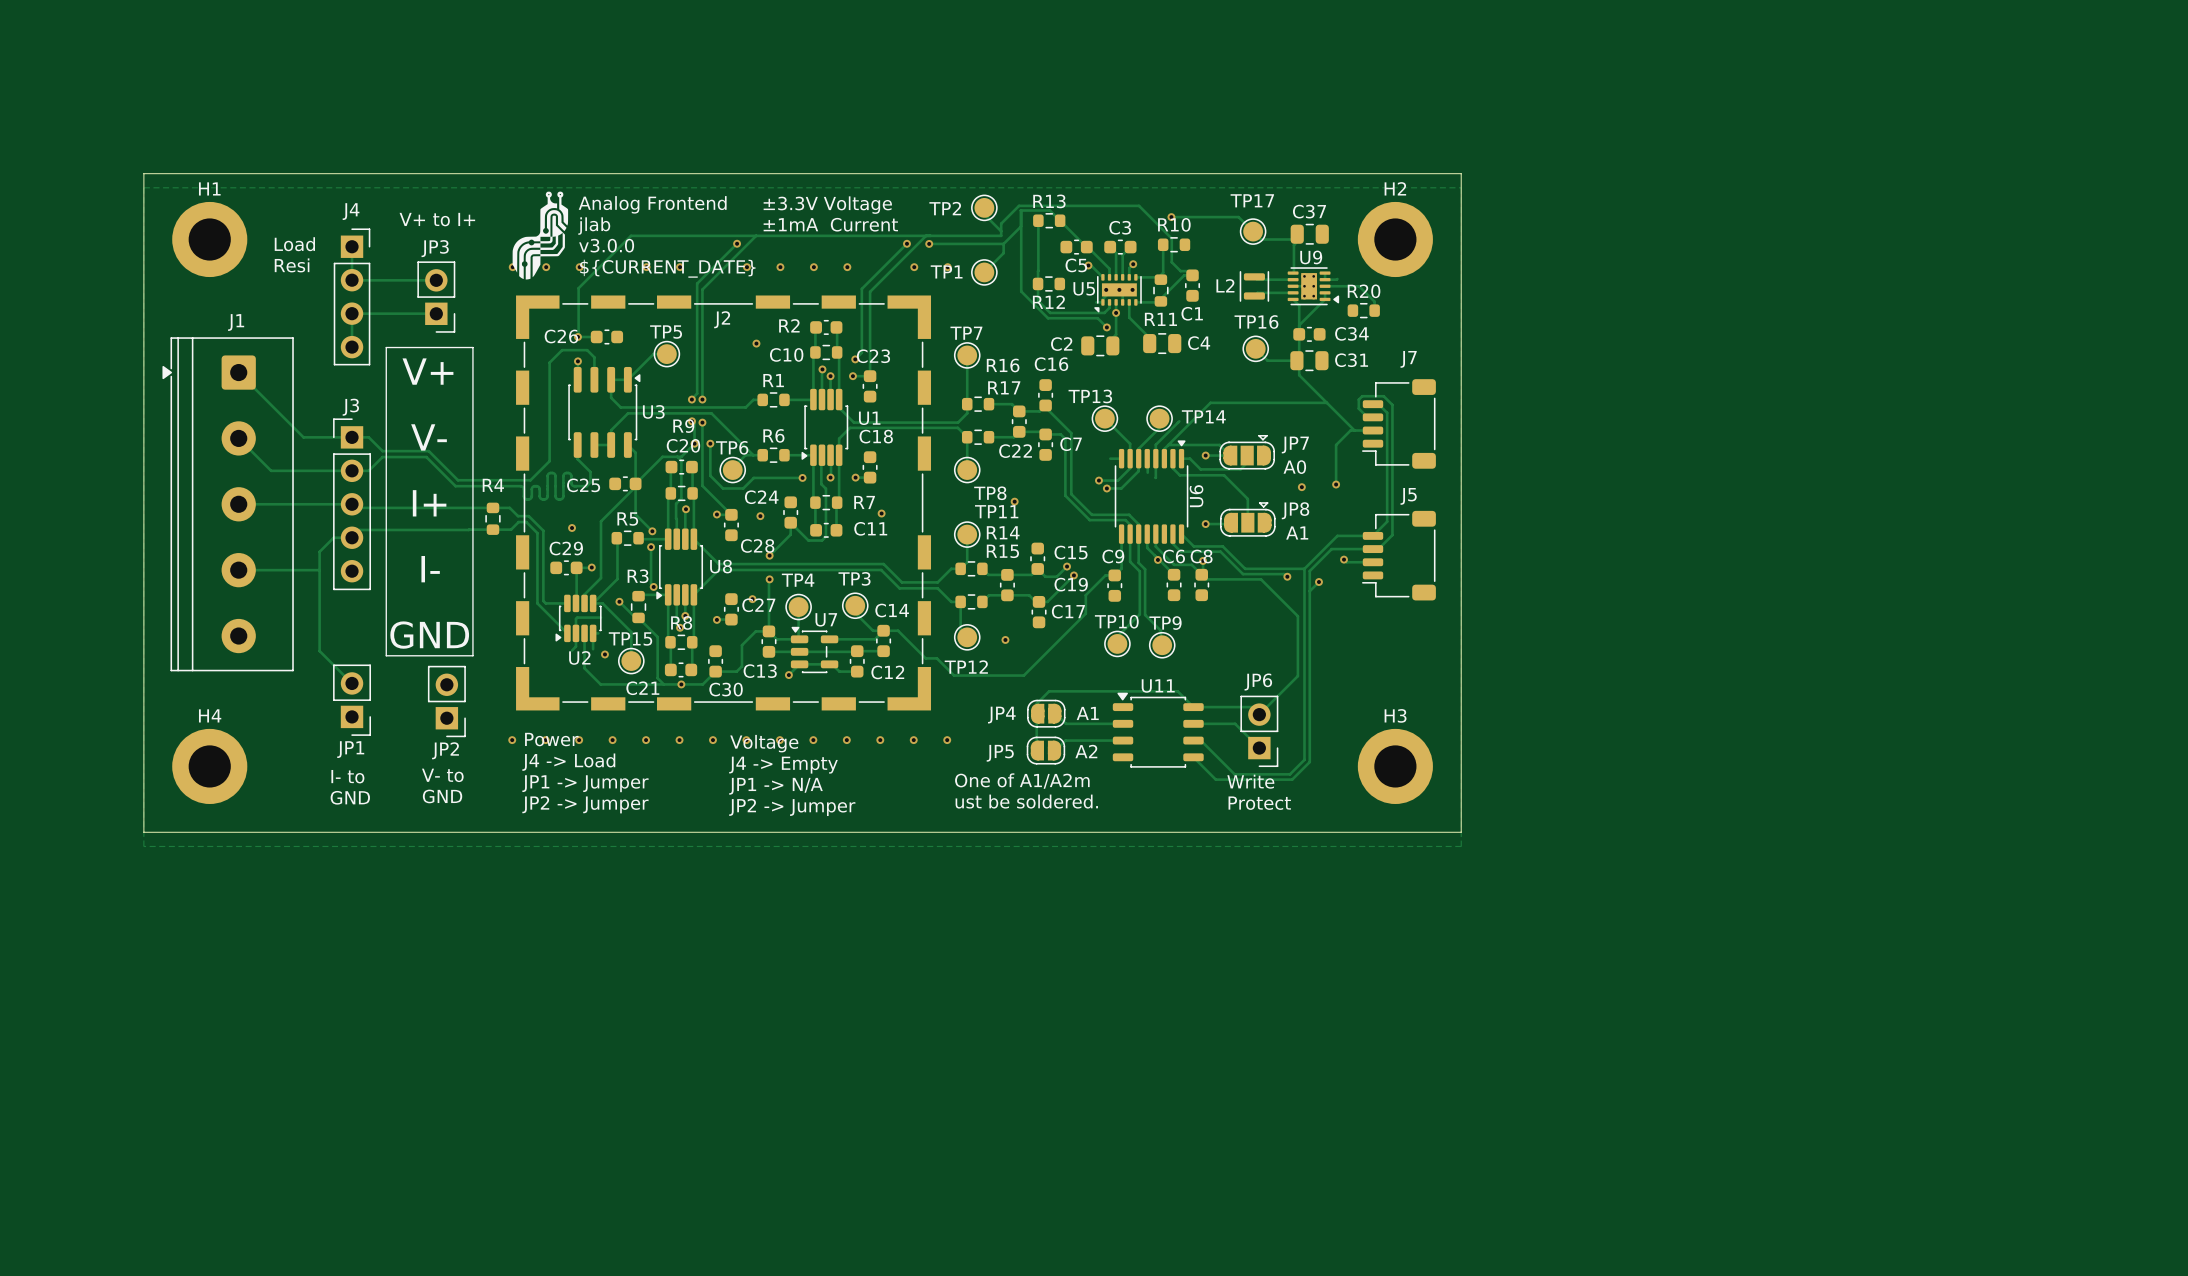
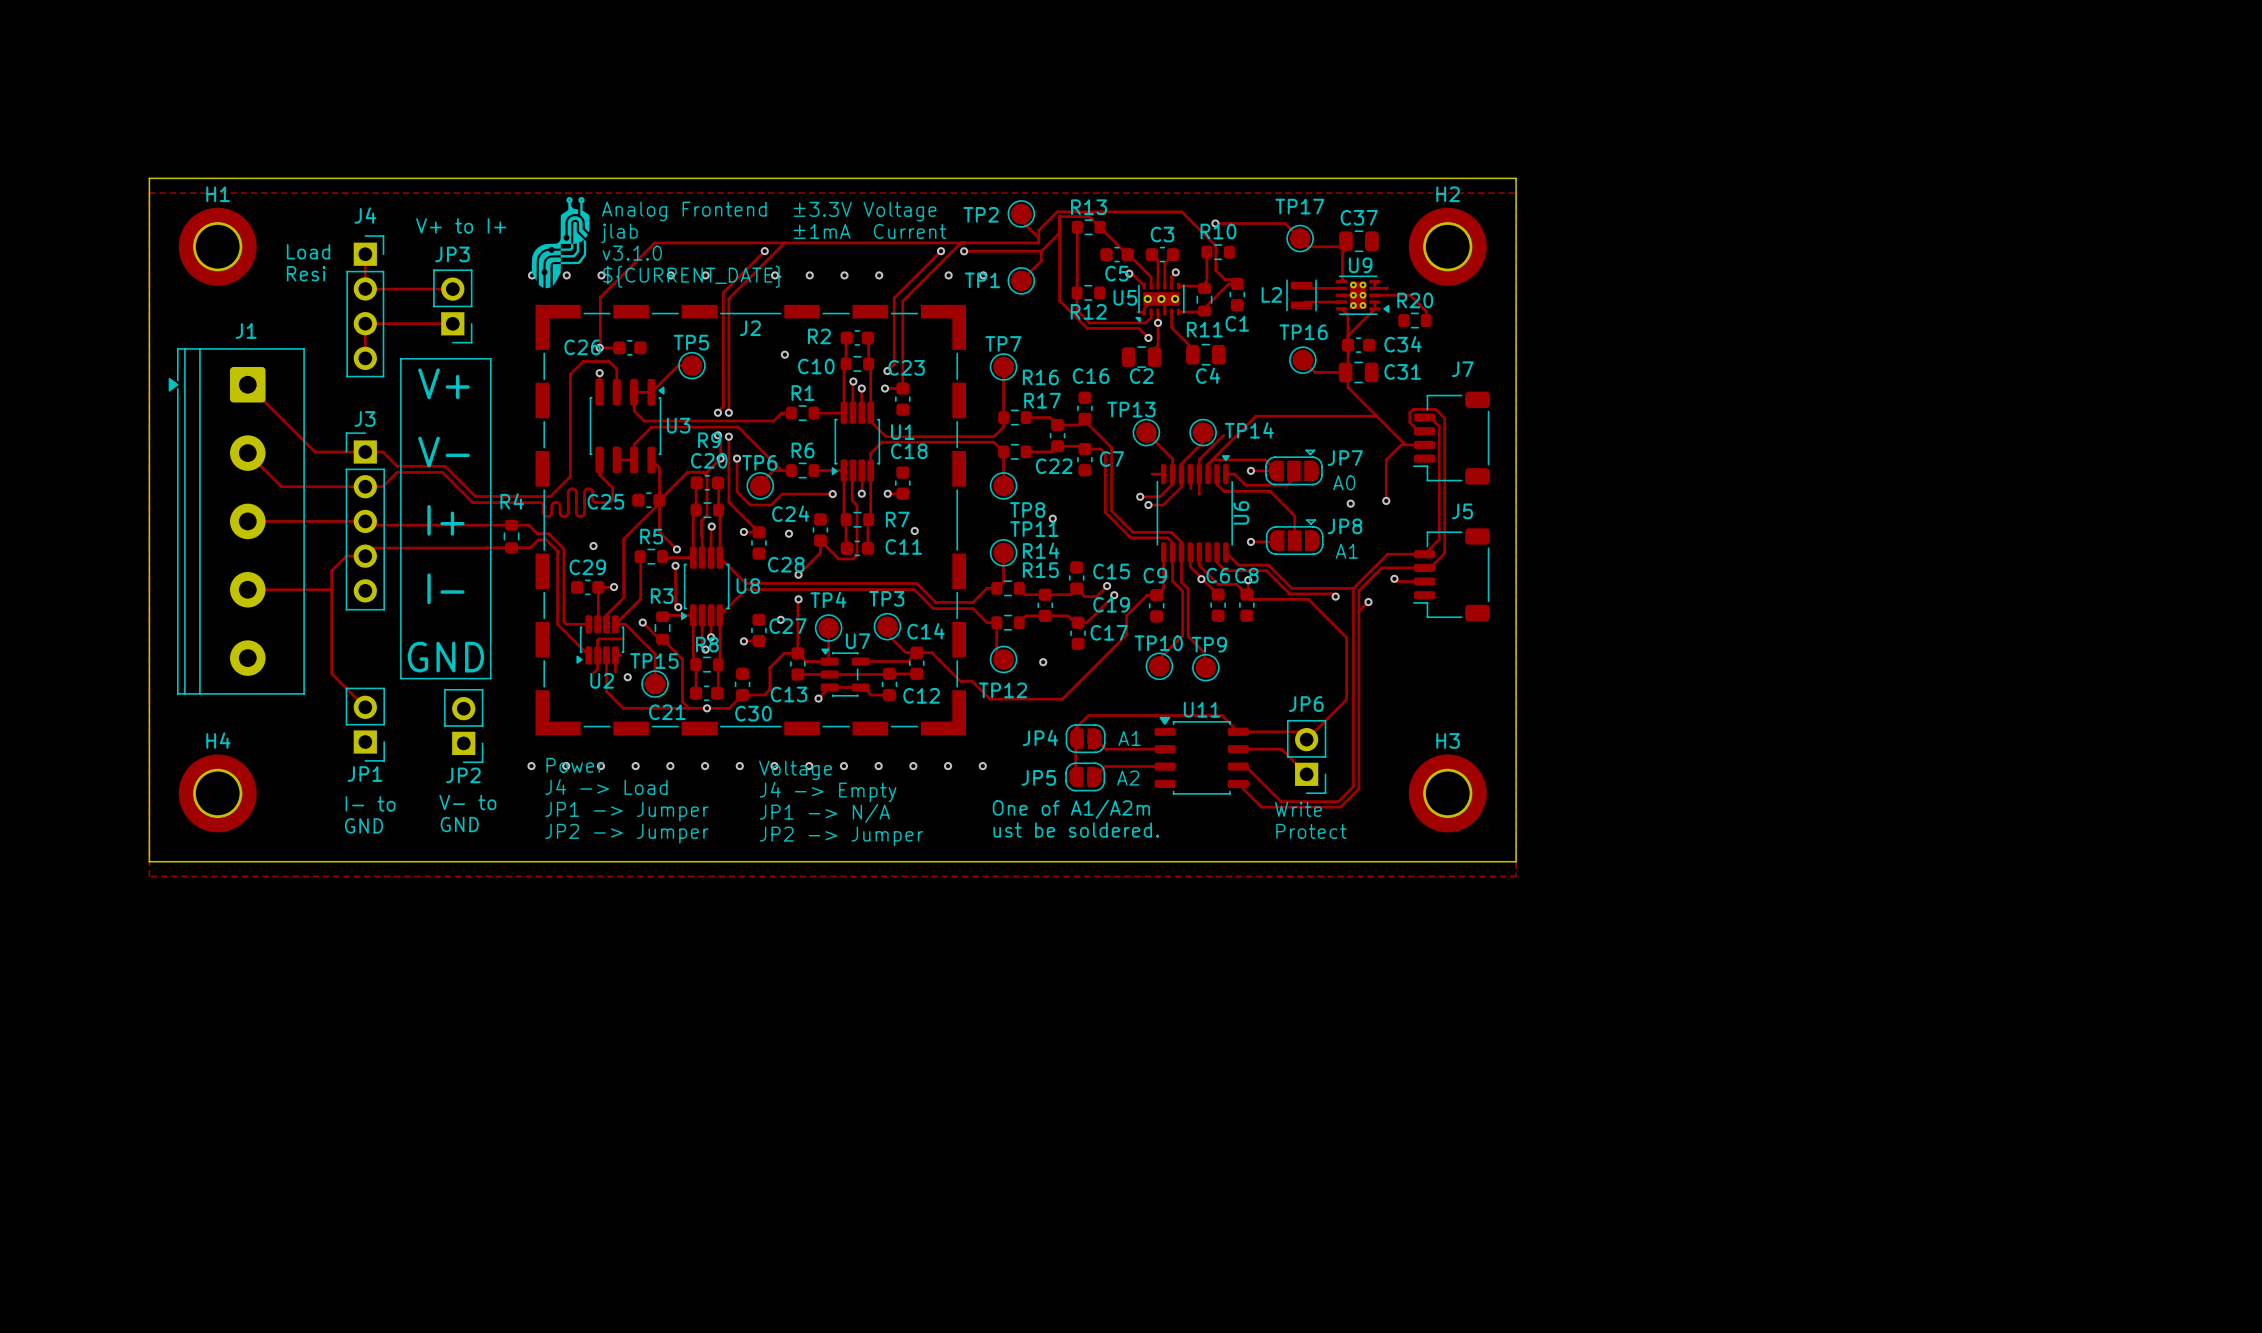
text: v3.0.0 (606, 245) -> v3.1.0 (632, 253)
C4 name position: C4 (1199, 343) -> C4 (1208, 375)
C2 name position: C2 (1061, 344) -> C2 (1141, 376)

